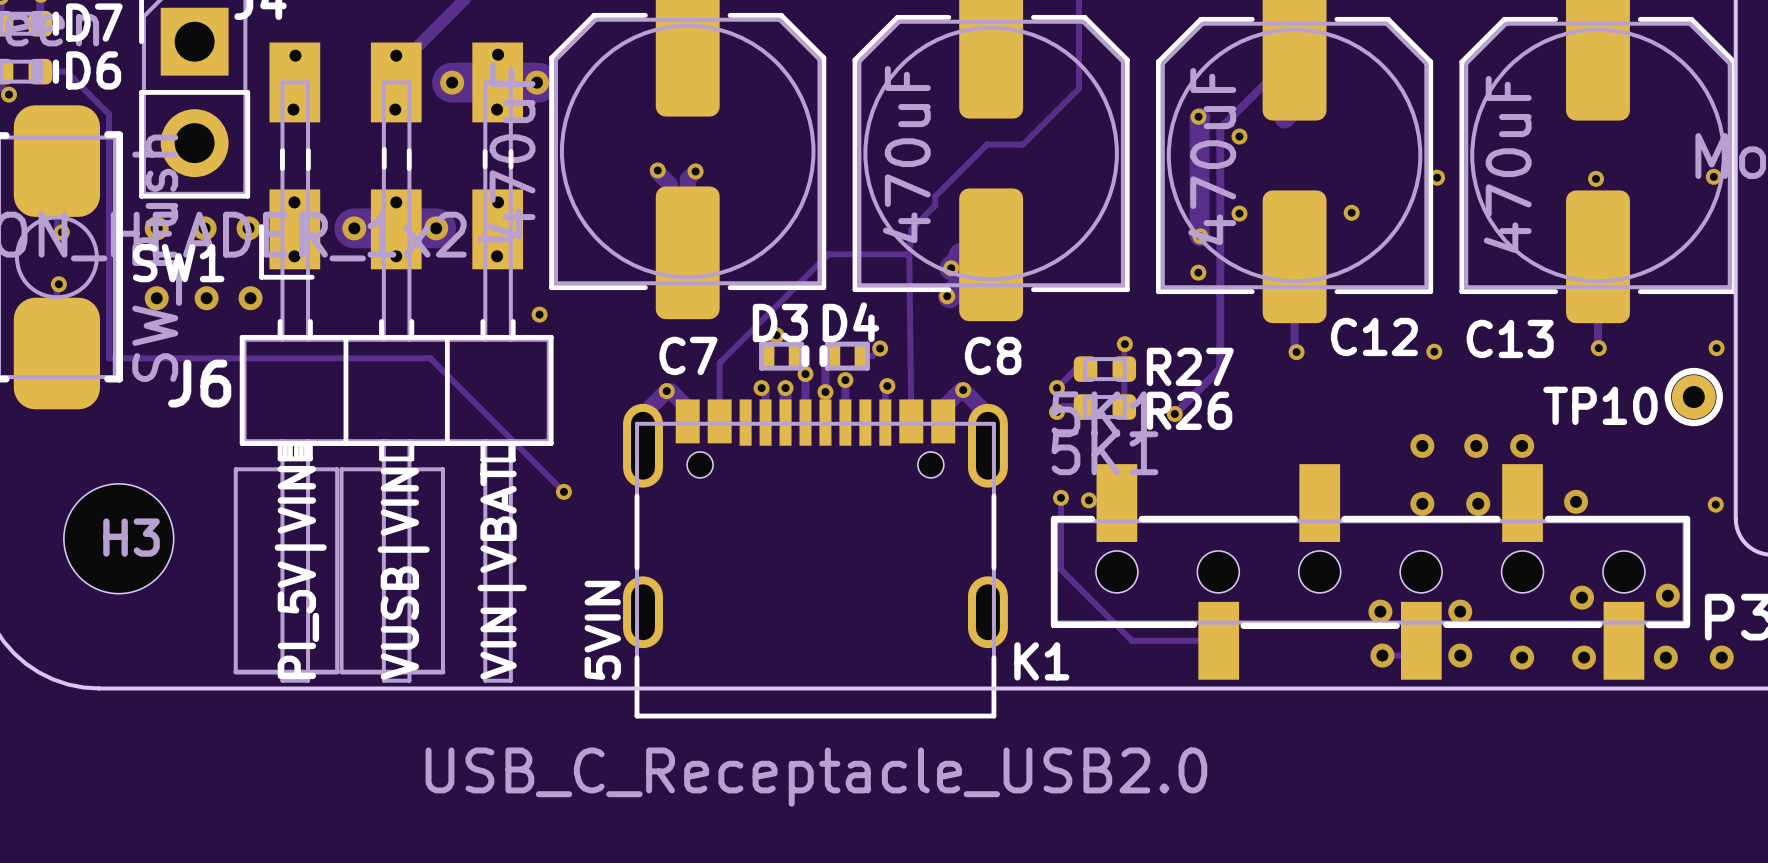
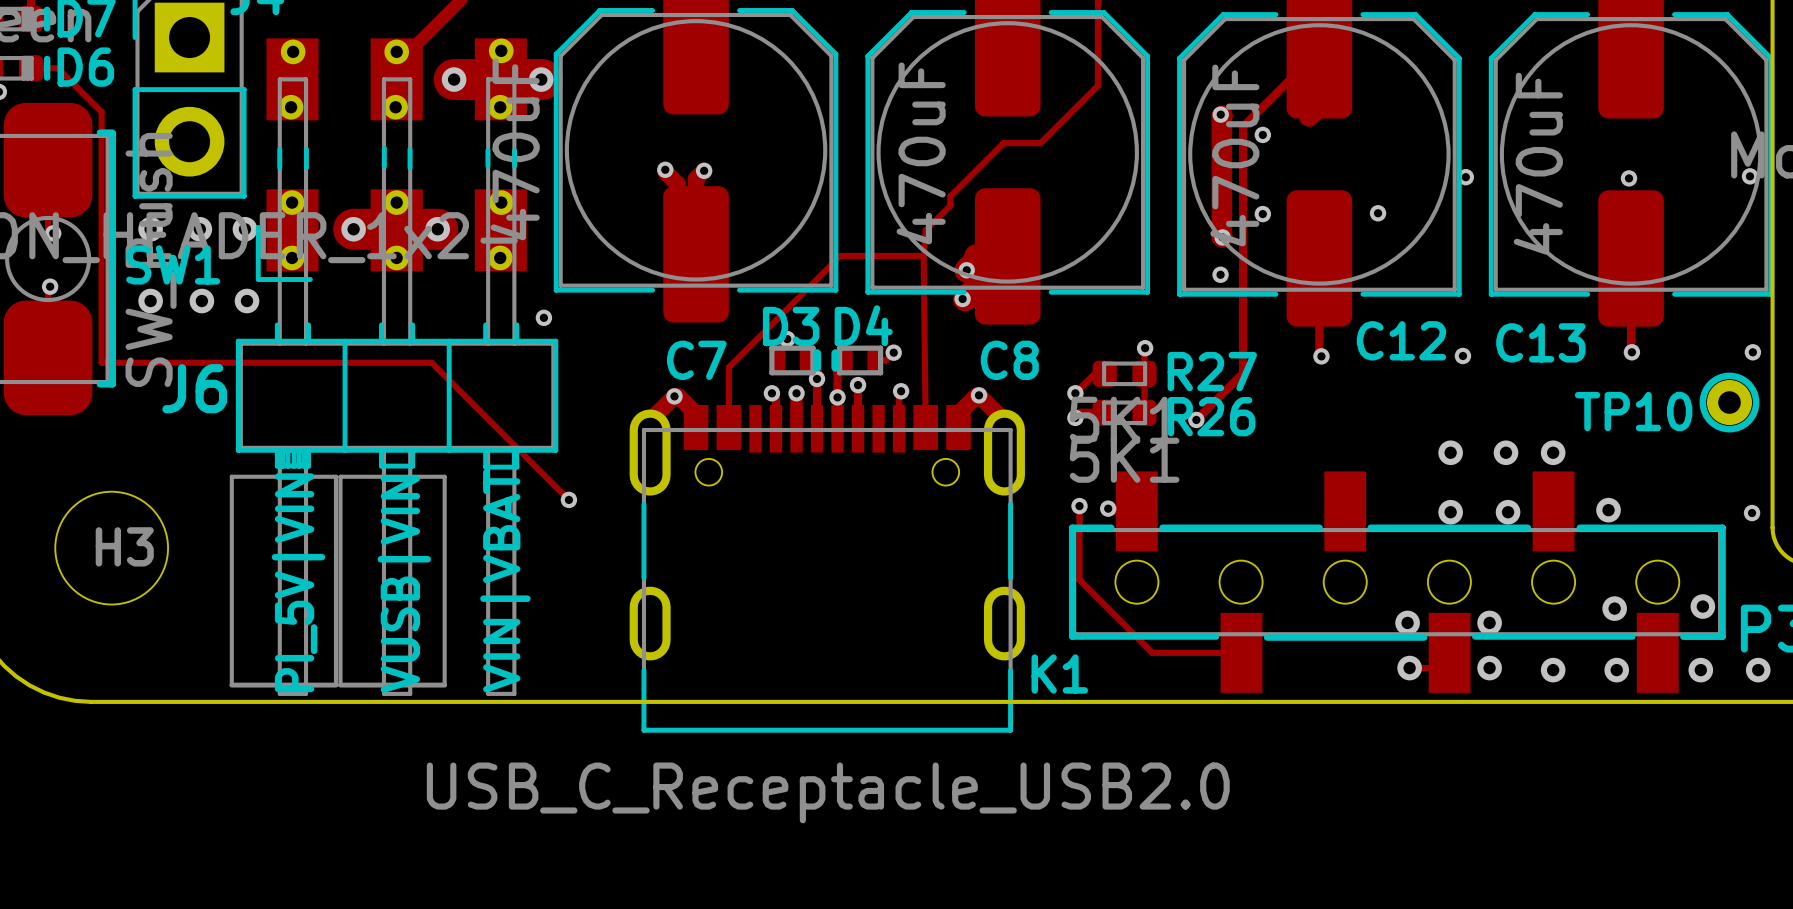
text: 5VIN (602, 630) -> none

